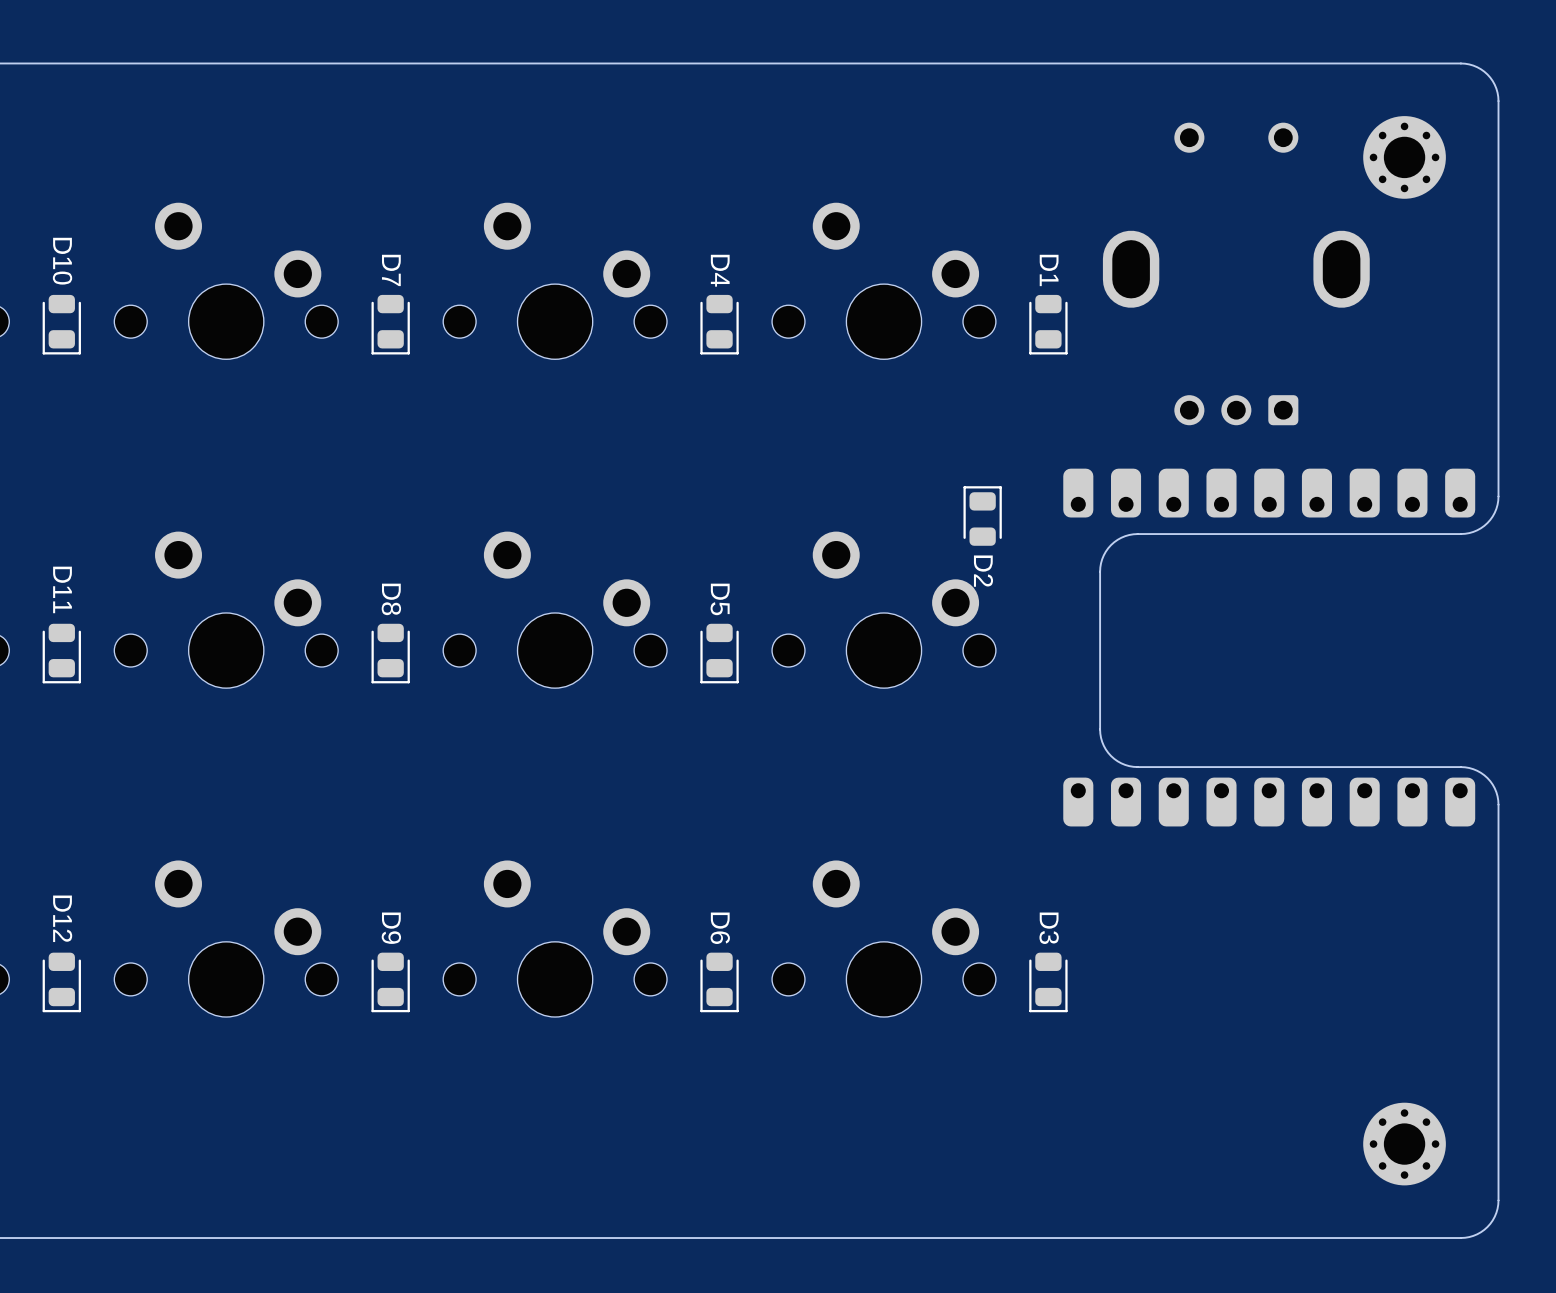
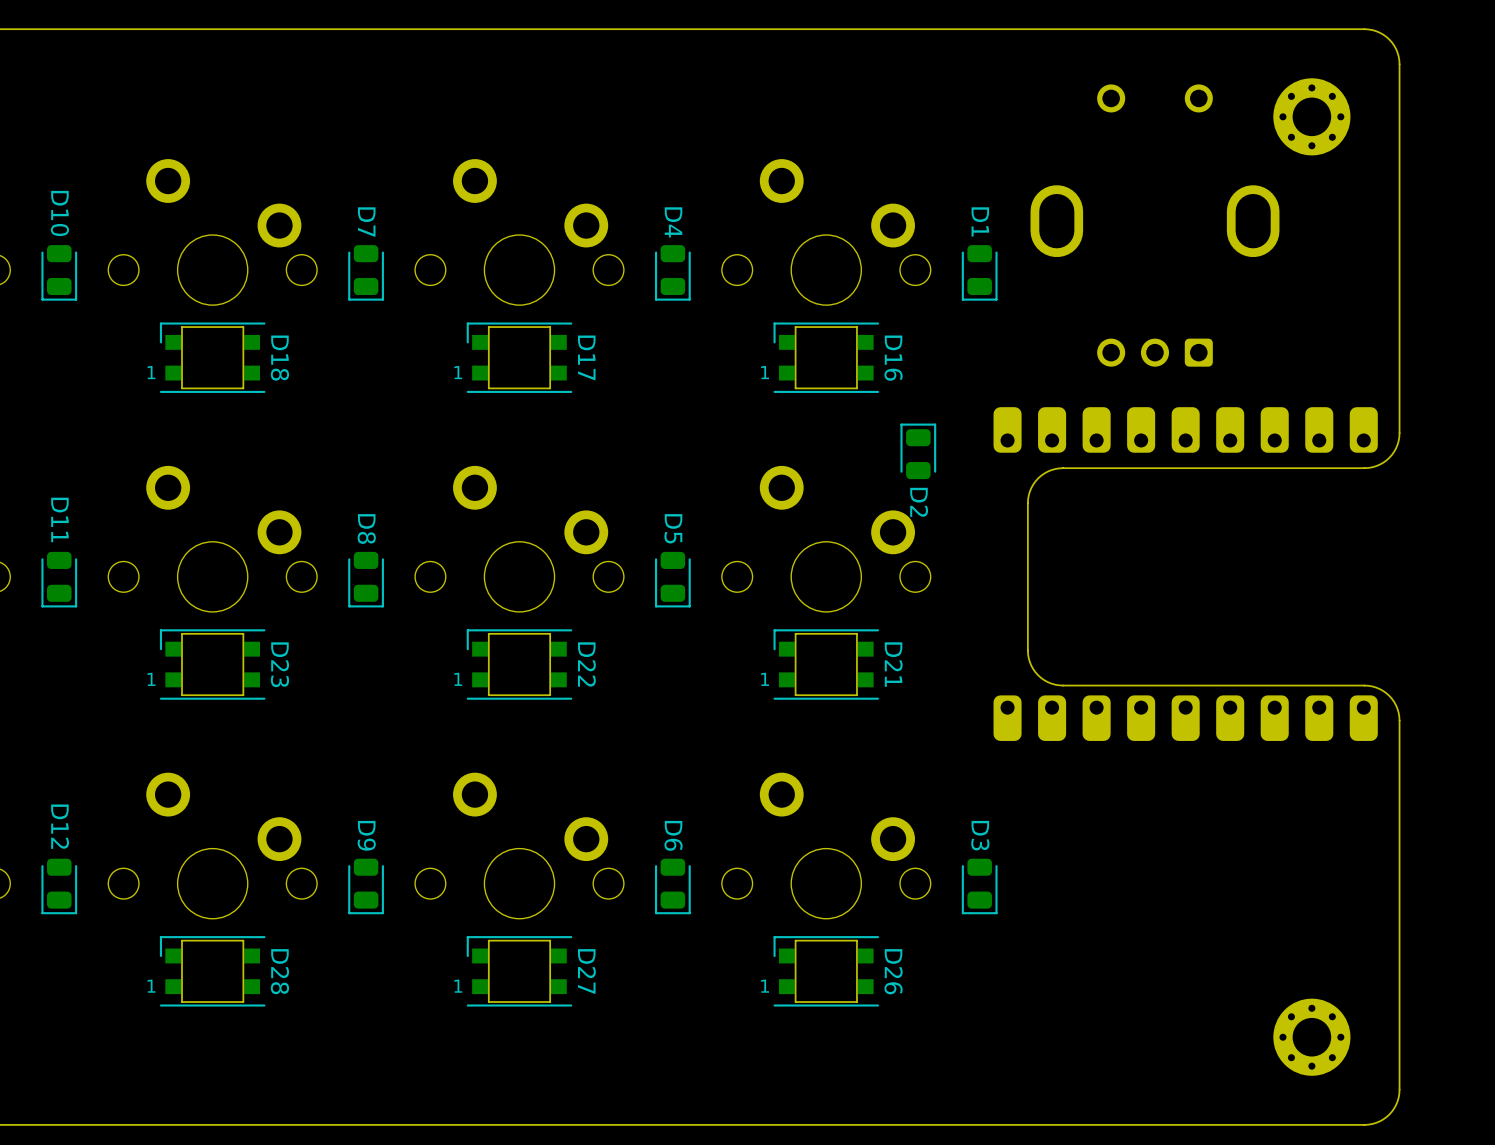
D18: none -> (212, 357)
D17: none -> (519, 357)
D16: none -> (826, 357)
D23: none -> (212, 664)
D22: none -> (519, 664)
D21: none -> (826, 664)
D28: none -> (212, 971)
D27: none -> (519, 971)
D26: none -> (826, 971)

